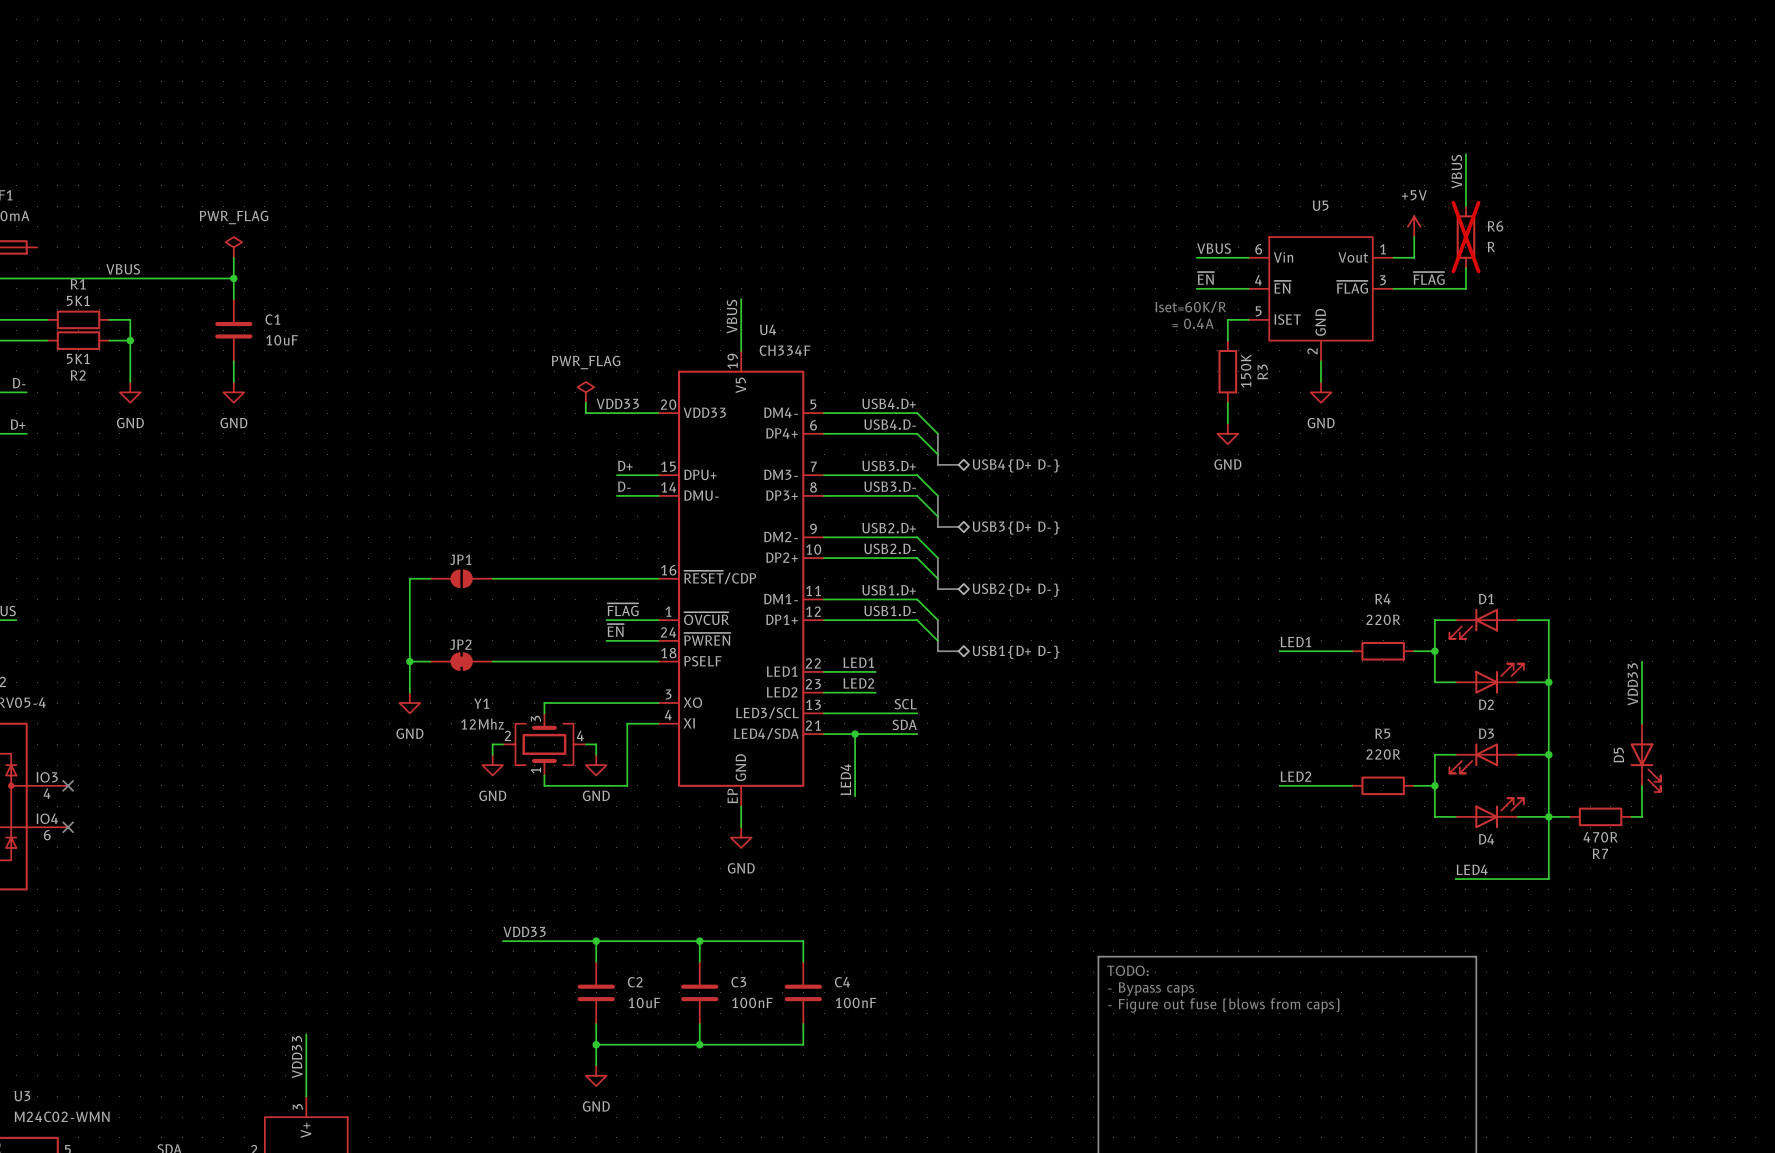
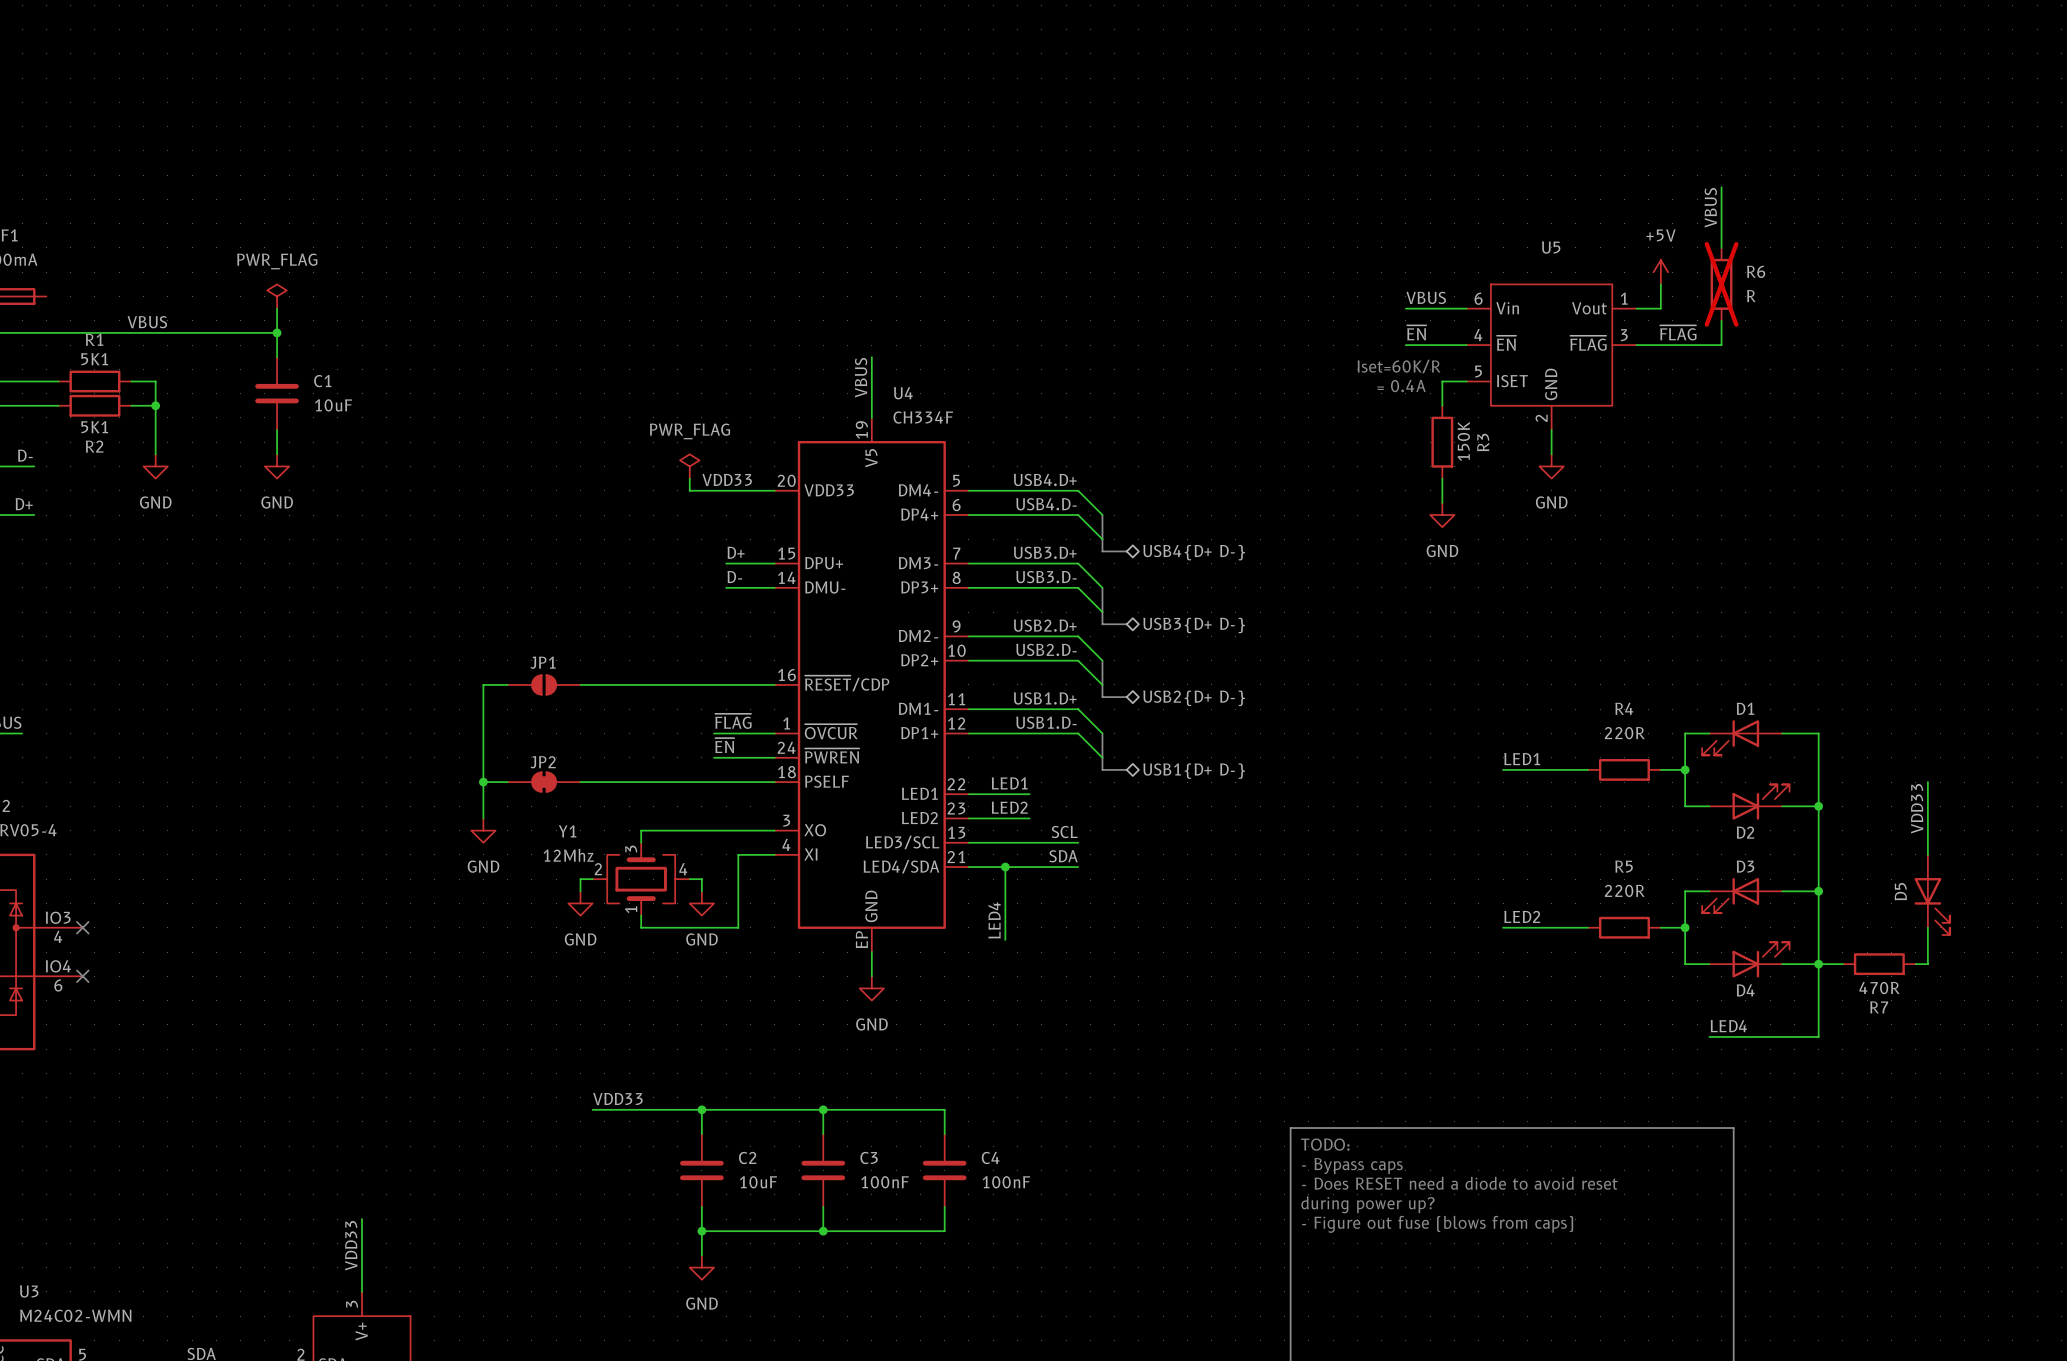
text: - Figure out fuse (blows from caps) (1223, 1005) -> - Does RESET need a diode to avoid reset (1459, 1183)
text: none -> during power up? (1367, 1204)
text: none -> - Figure out fuse (blows from caps) (1437, 1224)

